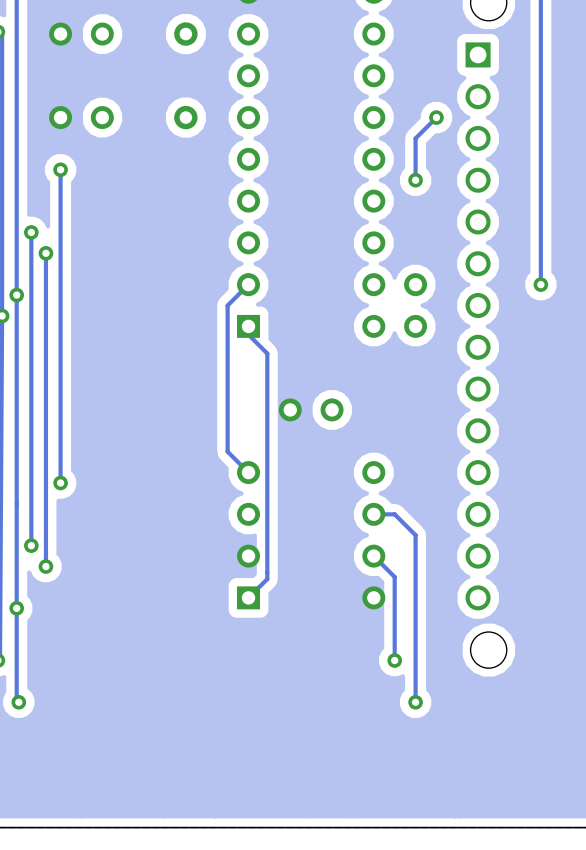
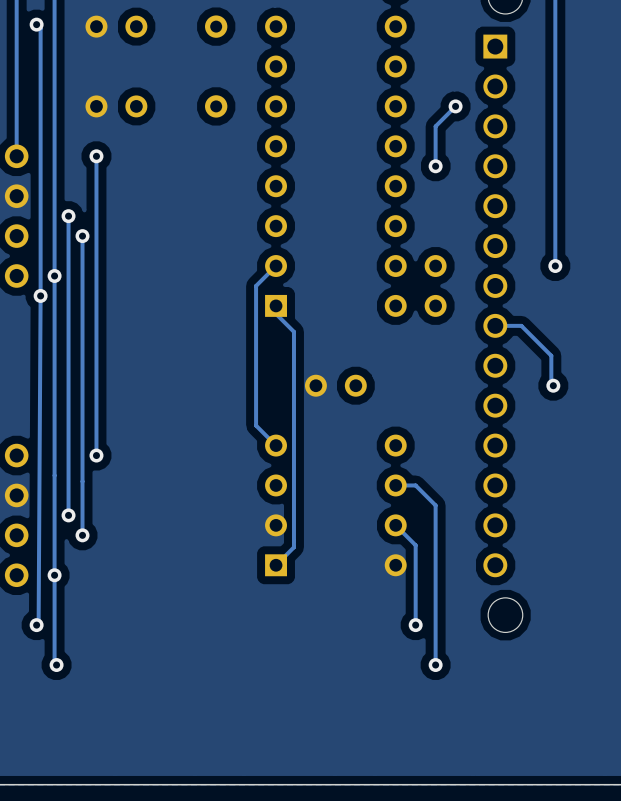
track: none -> (495, 325) (521, 325) (551, 355) (551, 383) (553, 385)
via: none -> (553, 385)

